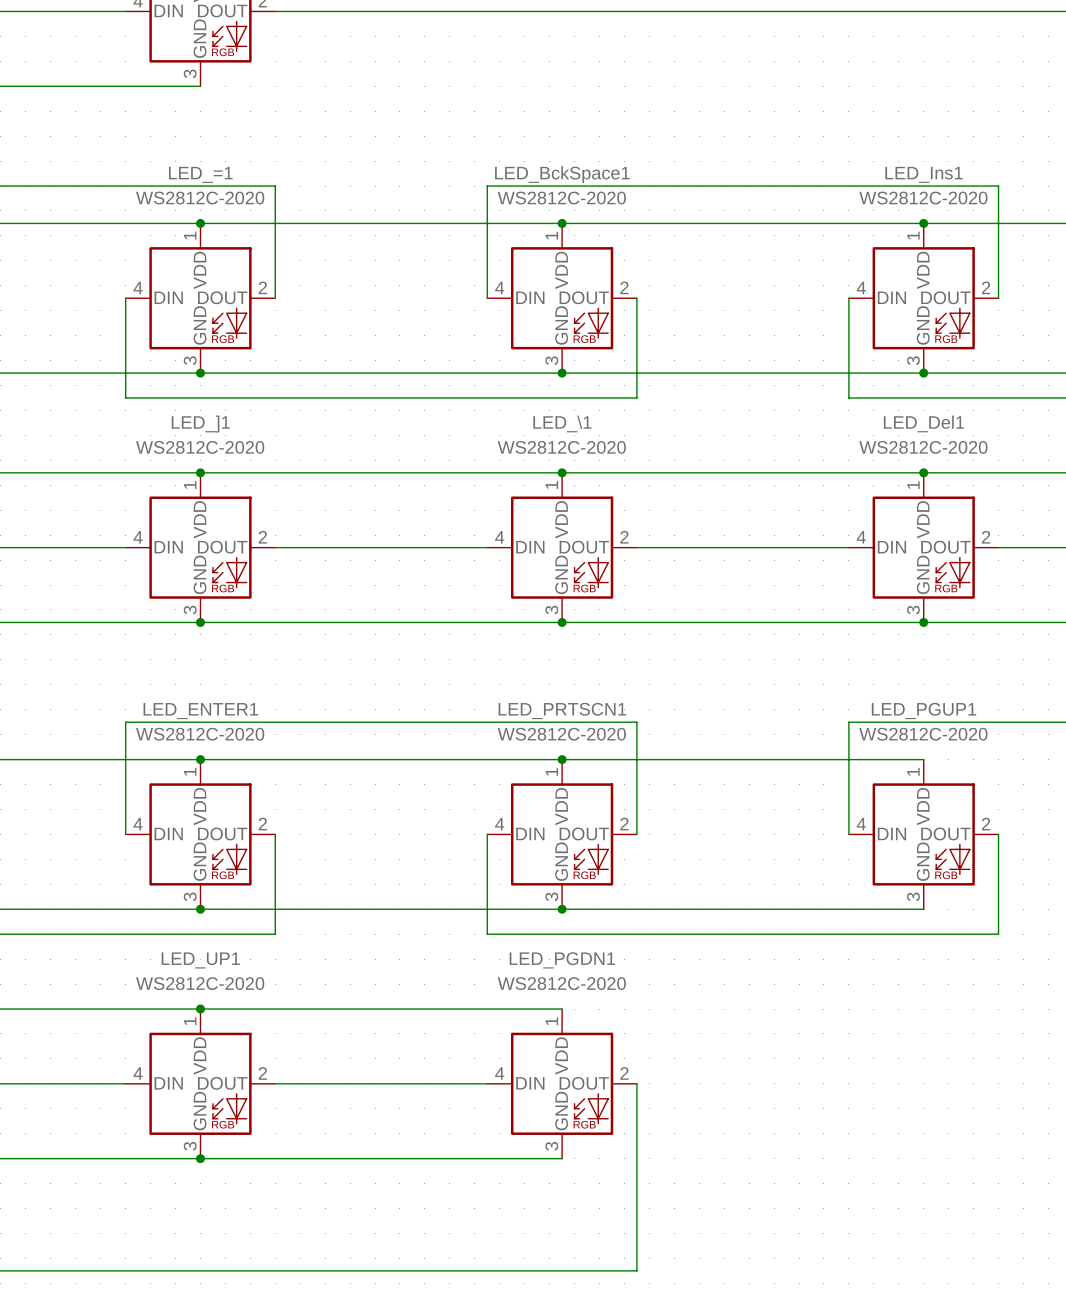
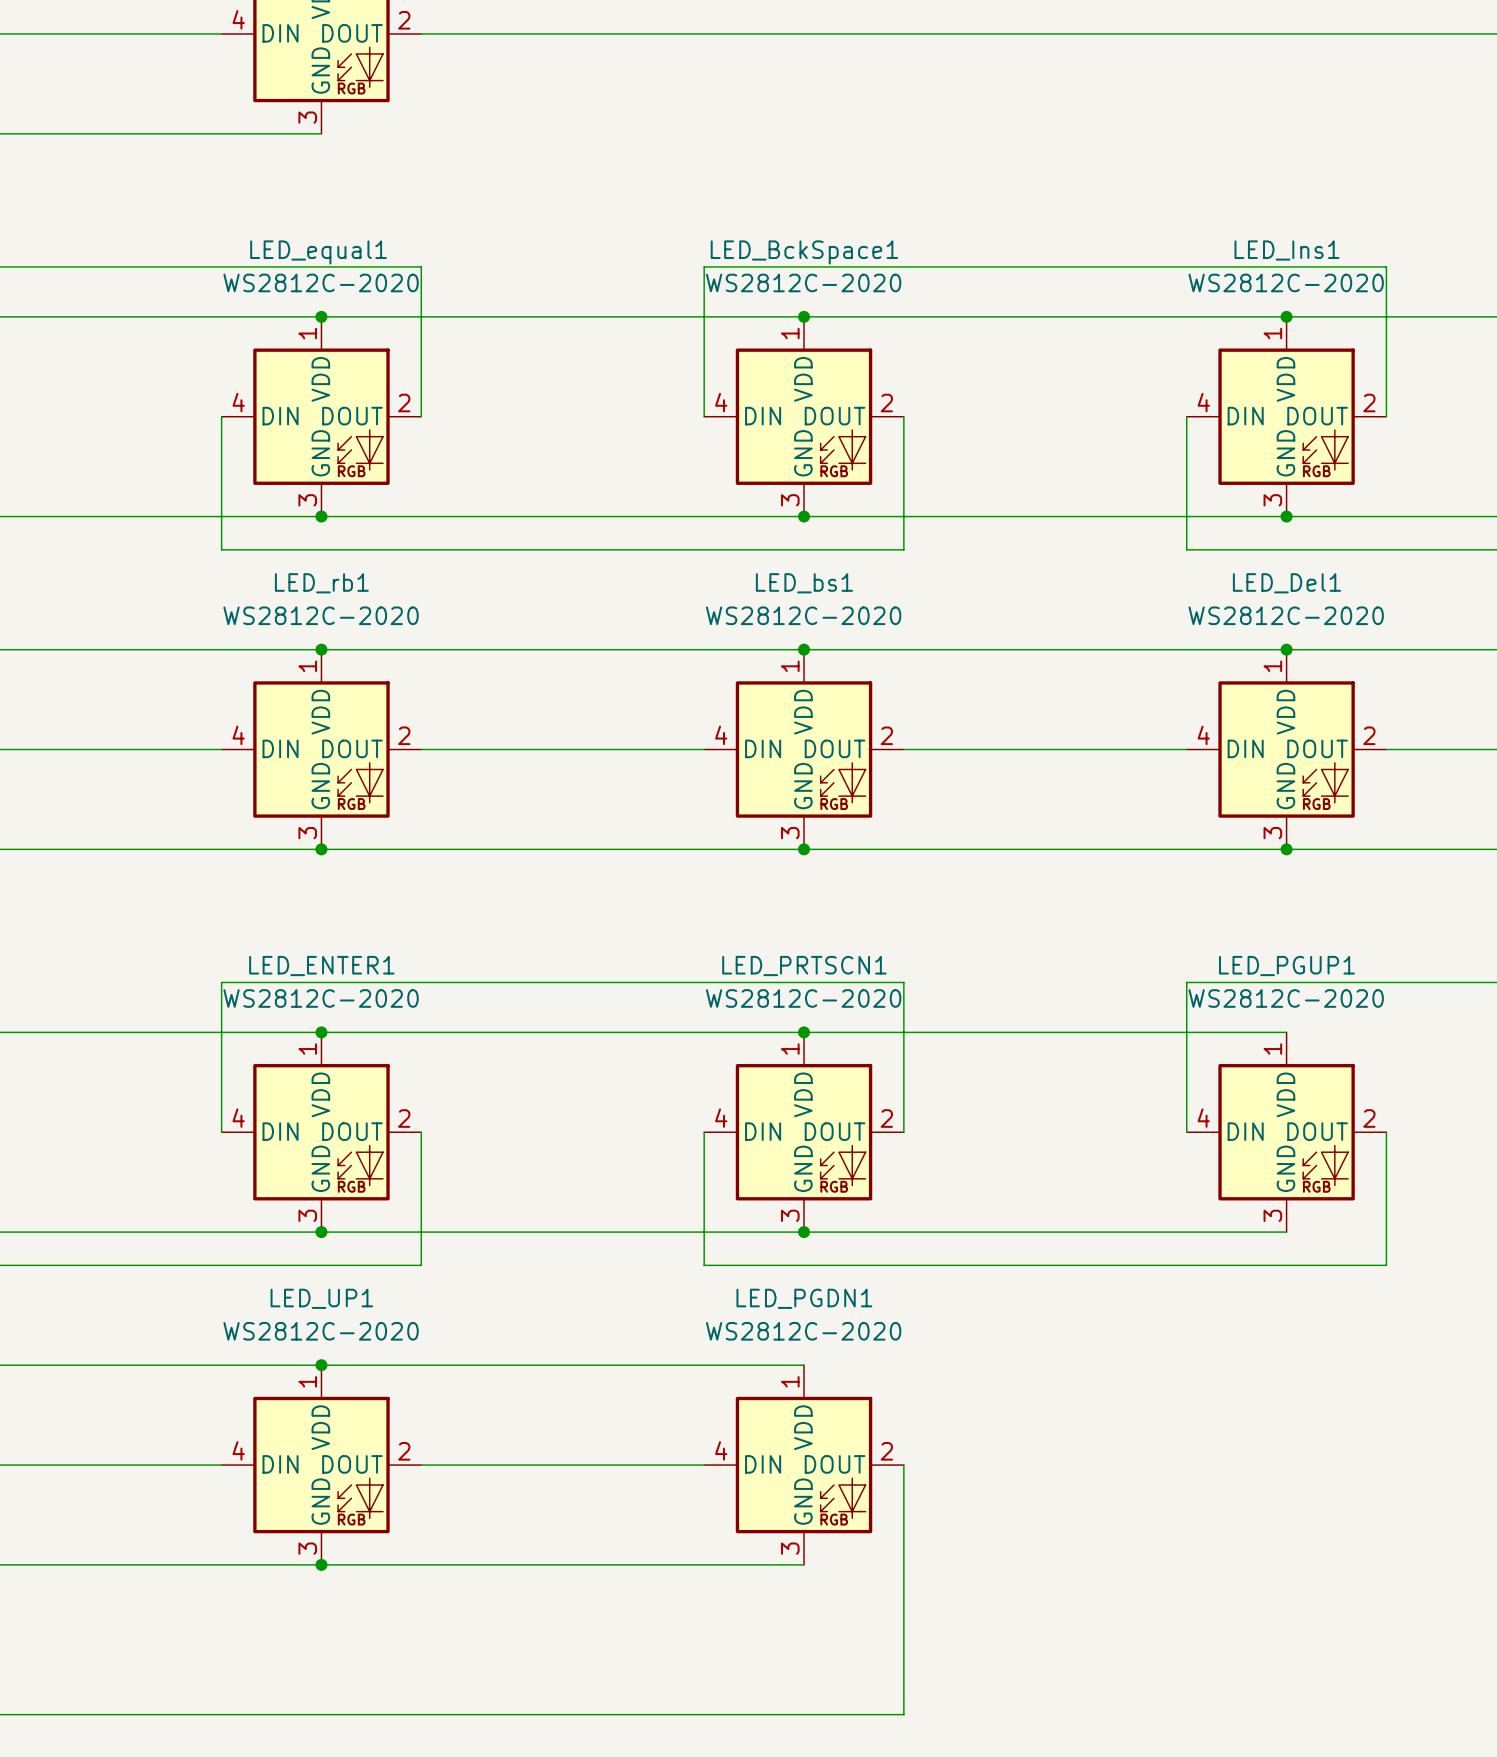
LED_=1 name: LED_=1 (200, 174) -> LED_equal1 (318, 252)
LED_\1 name: LED_\1 (562, 423) -> LED_bs1 (804, 583)
LED_]1 name: LED_]1 (200, 424) -> LED_rb1 (321, 583)

